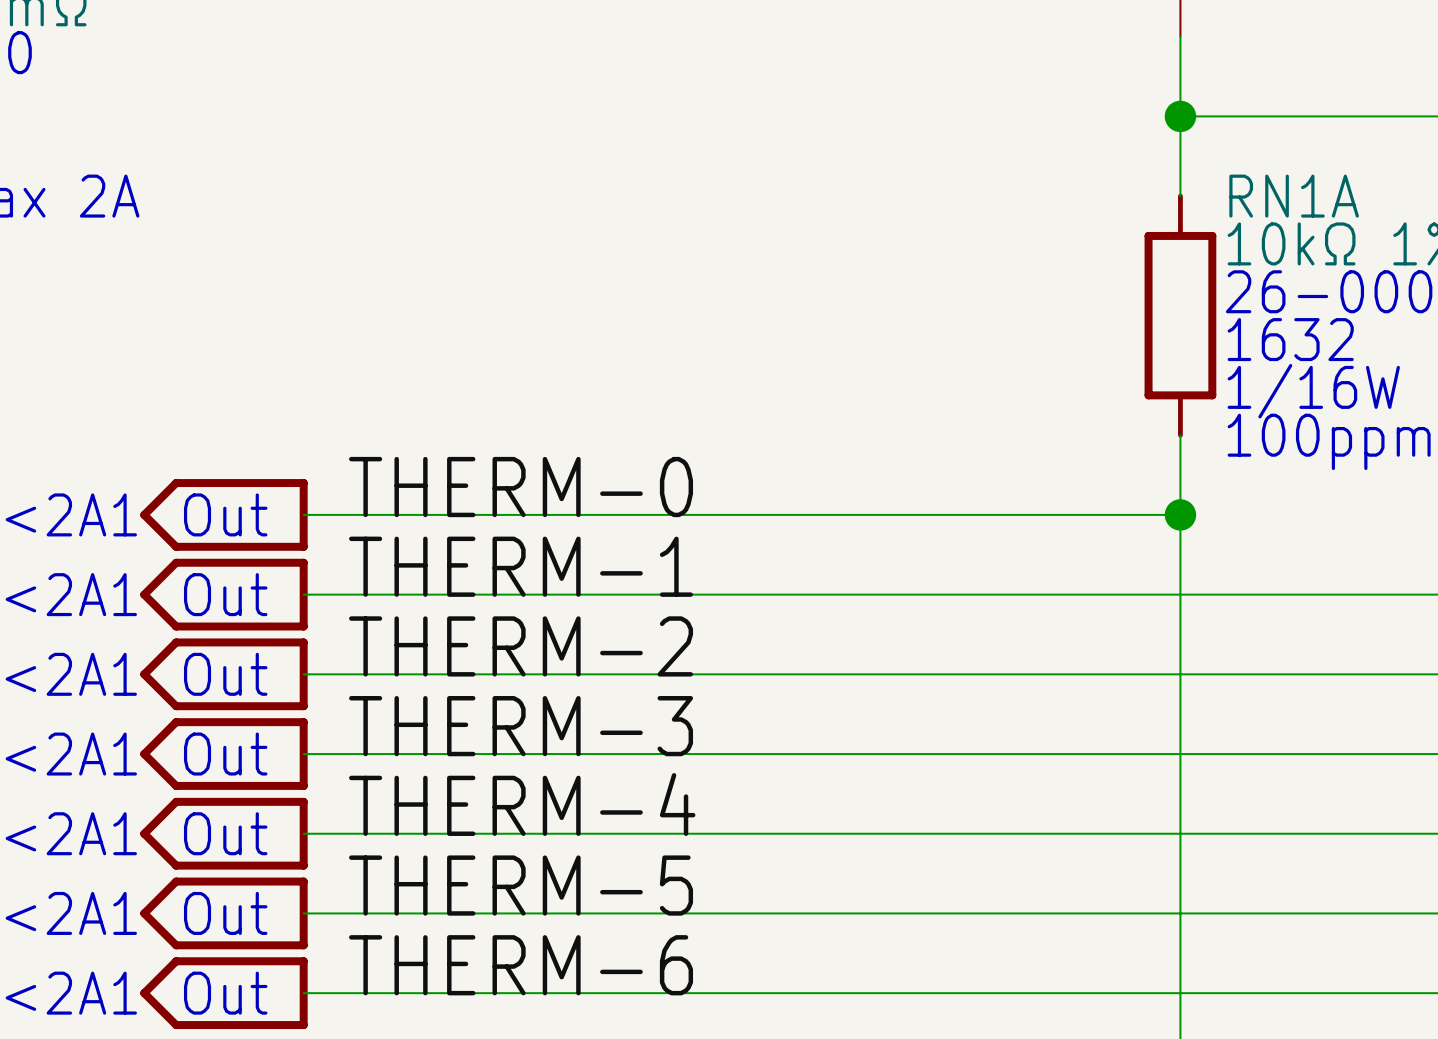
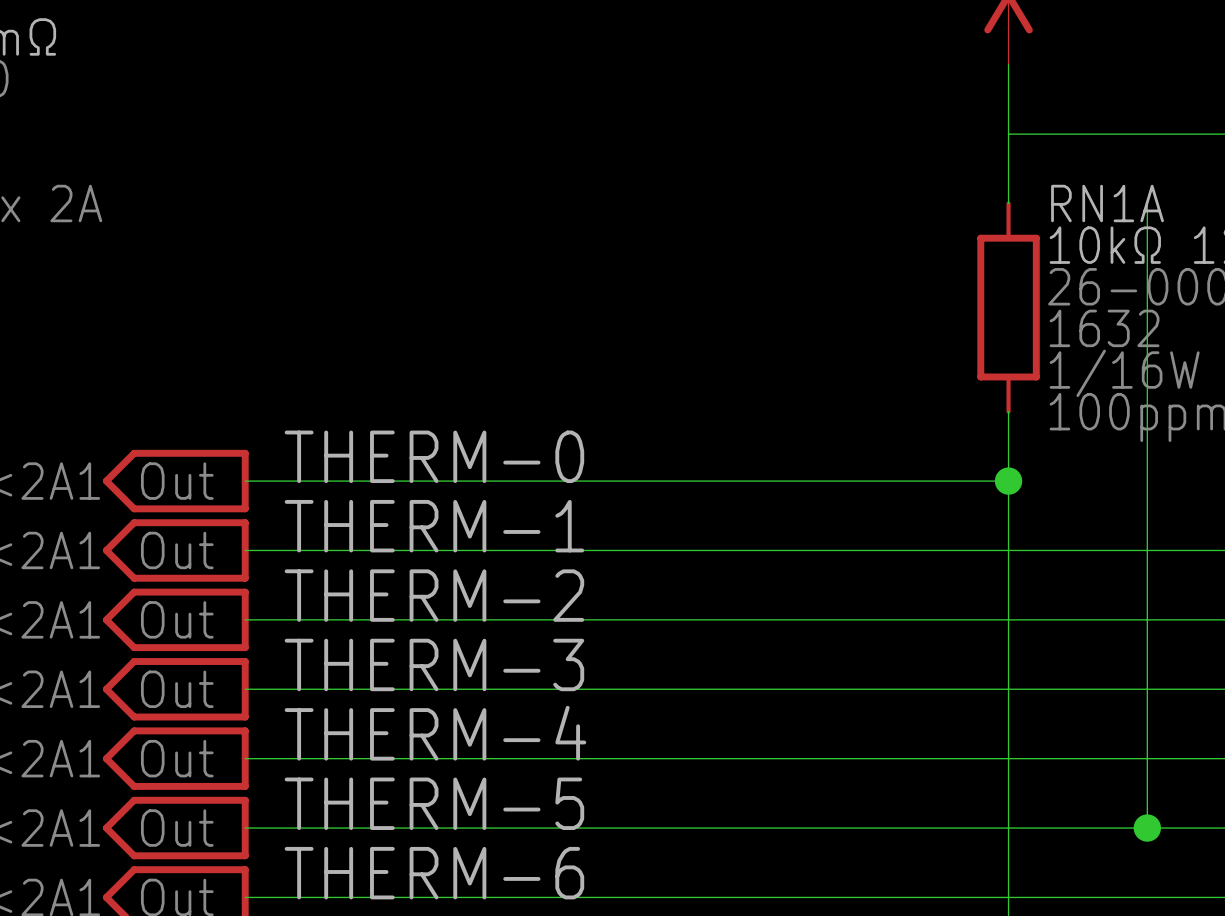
junction: (1180, 116) -> none
wire: none -> (1147, 203) (1147, 828)
junction: none -> (1147, 828)

